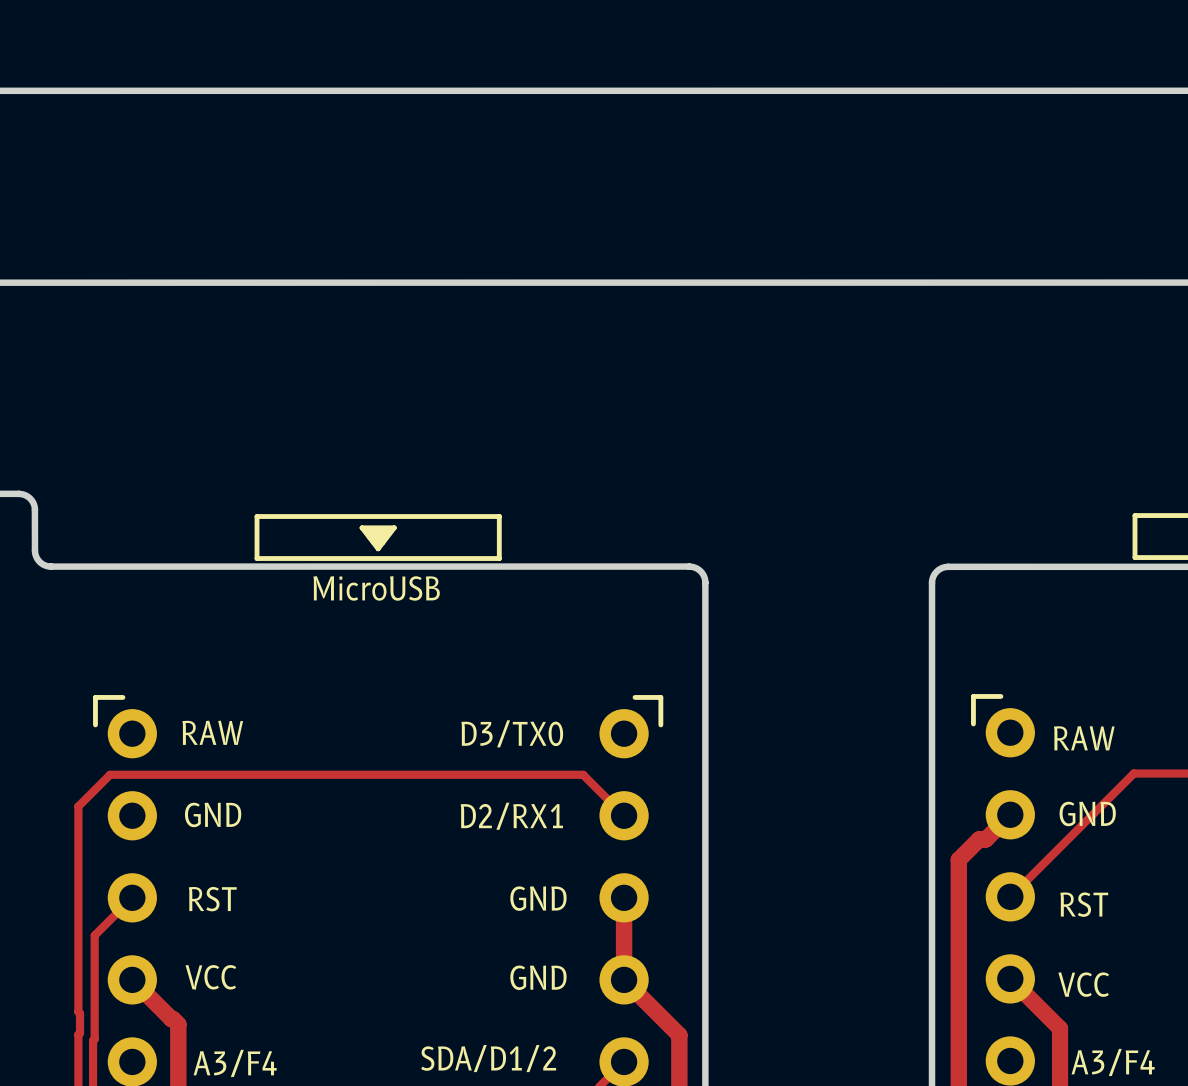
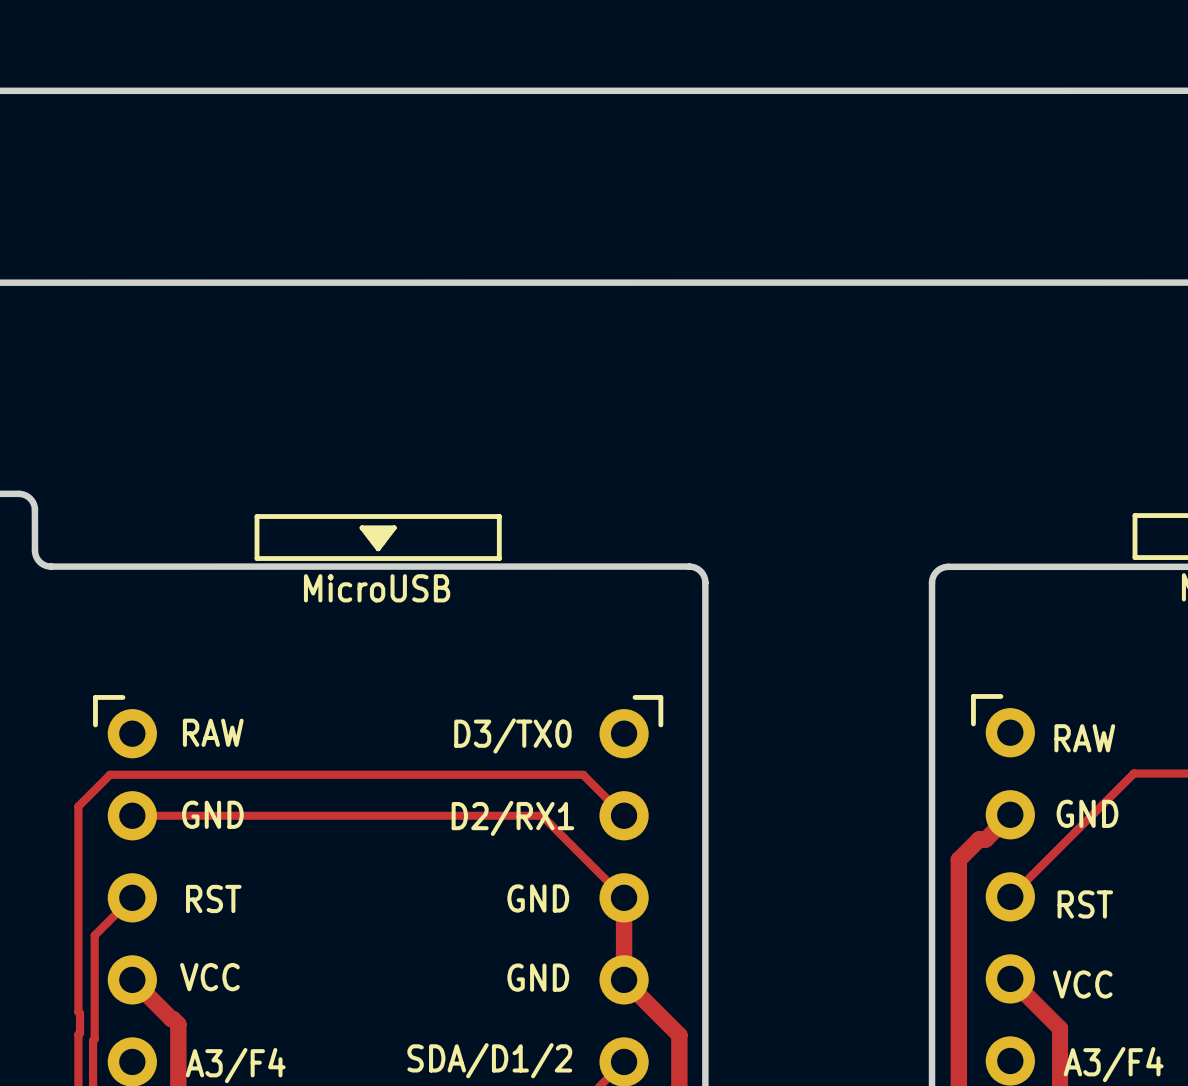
track: none -> (132, 815) (542, 815) (624, 897)

